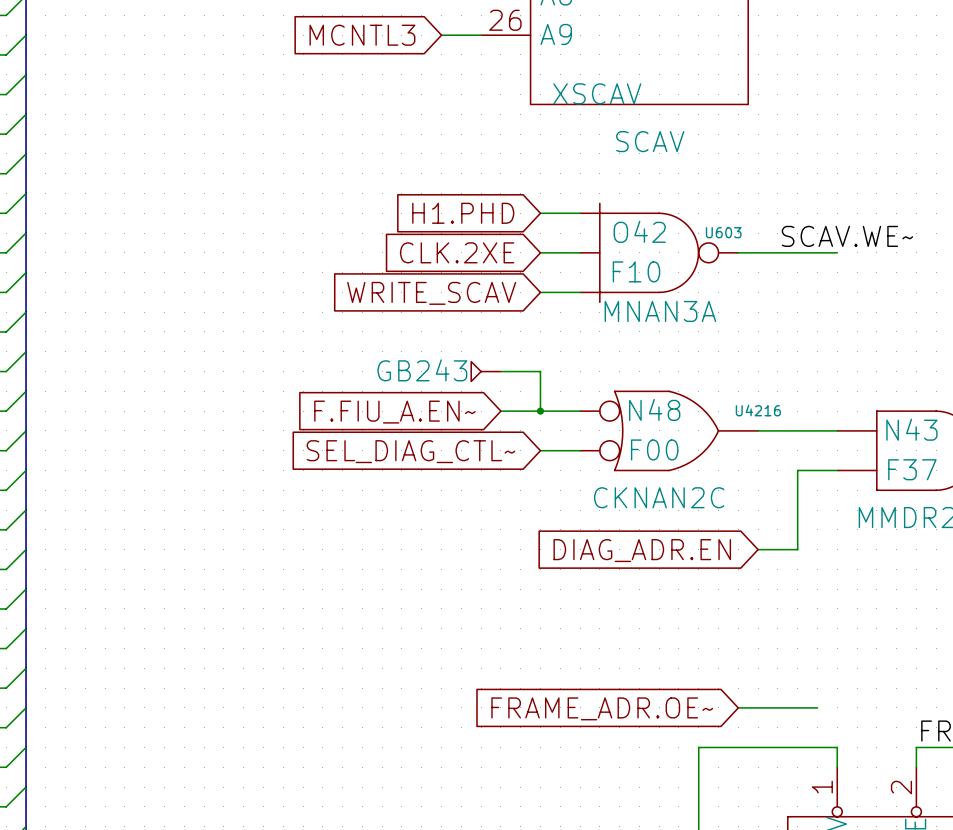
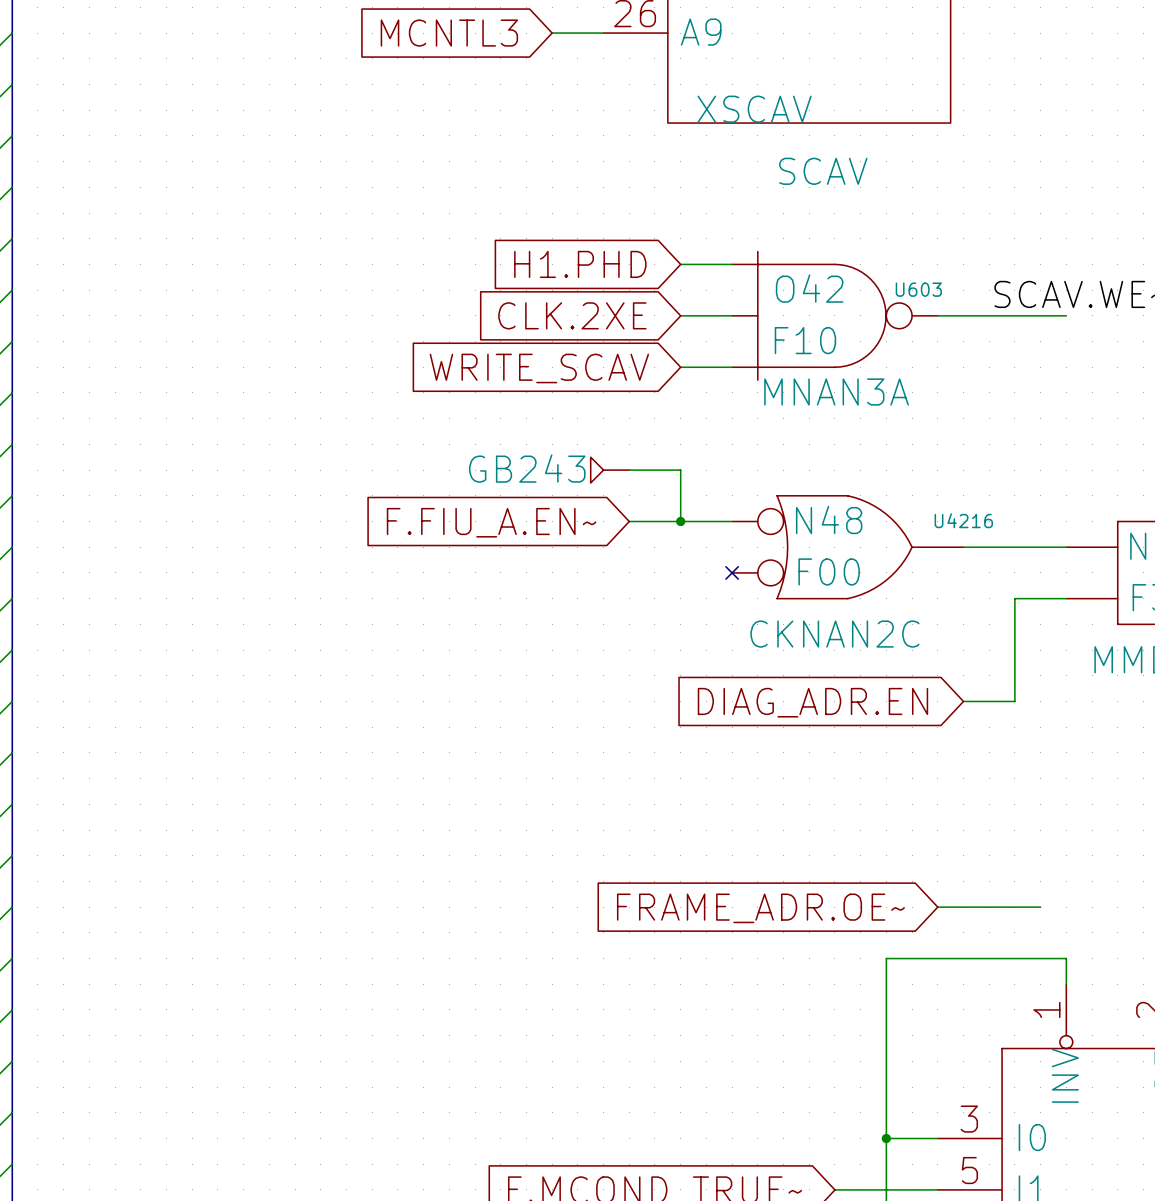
wire: (540, 450) (580, 450) -> none
no-connect mark: none -> (732, 572)
global label: SEL_DIAG_CTL~ (410, 451) -> none

